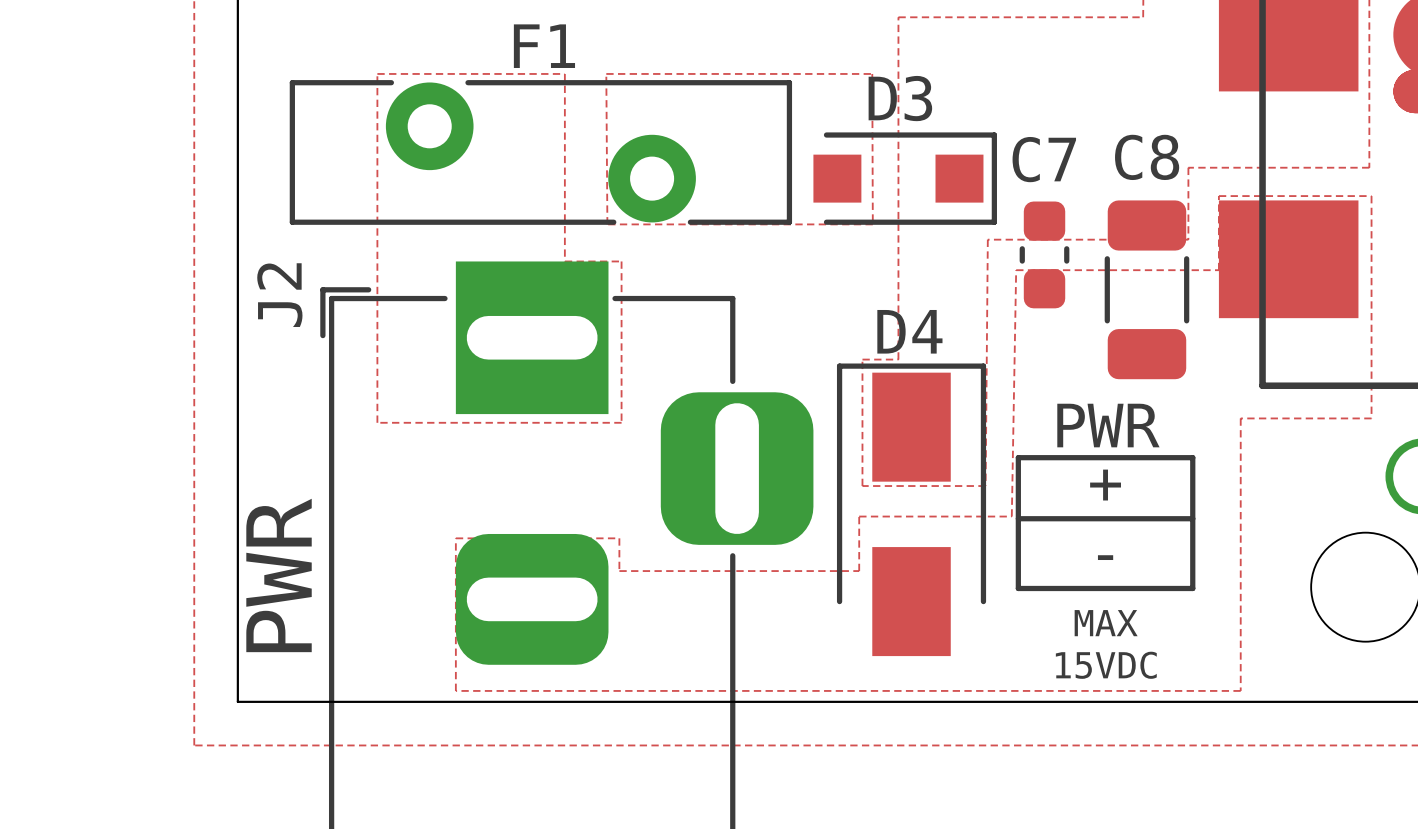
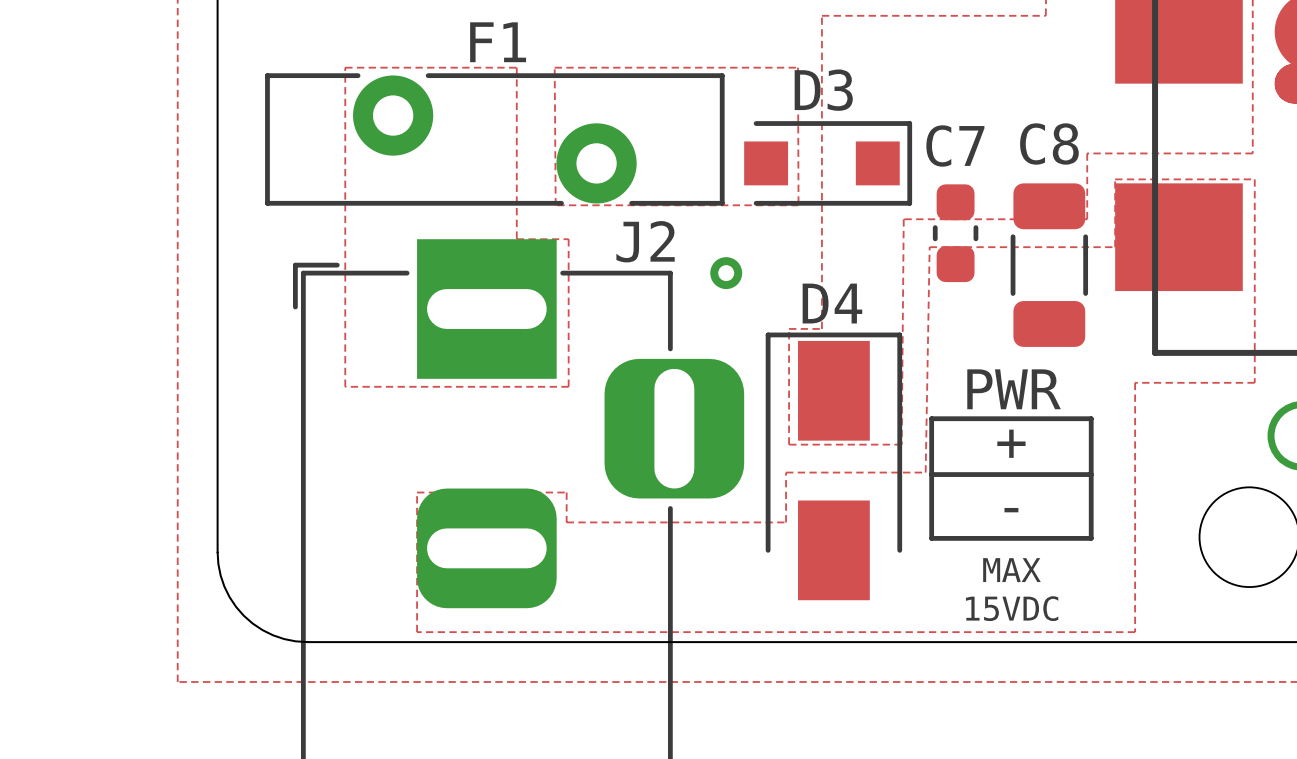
J2 name rotation: 0° (279, 295) -> 90° clockwise (645, 241)
J2 name position: J2 (279, 295) -> J2 (645, 241)
via: none -> (726, 273)
text: PWR (279, 575) -> none
board edge: (237, 603) (237, 701) (335, 701) -> (217, 552) (218, 564) (224, 586) (236, 606) (243, 615) (252, 623) (273, 635) (295, 641) (307, 642)

